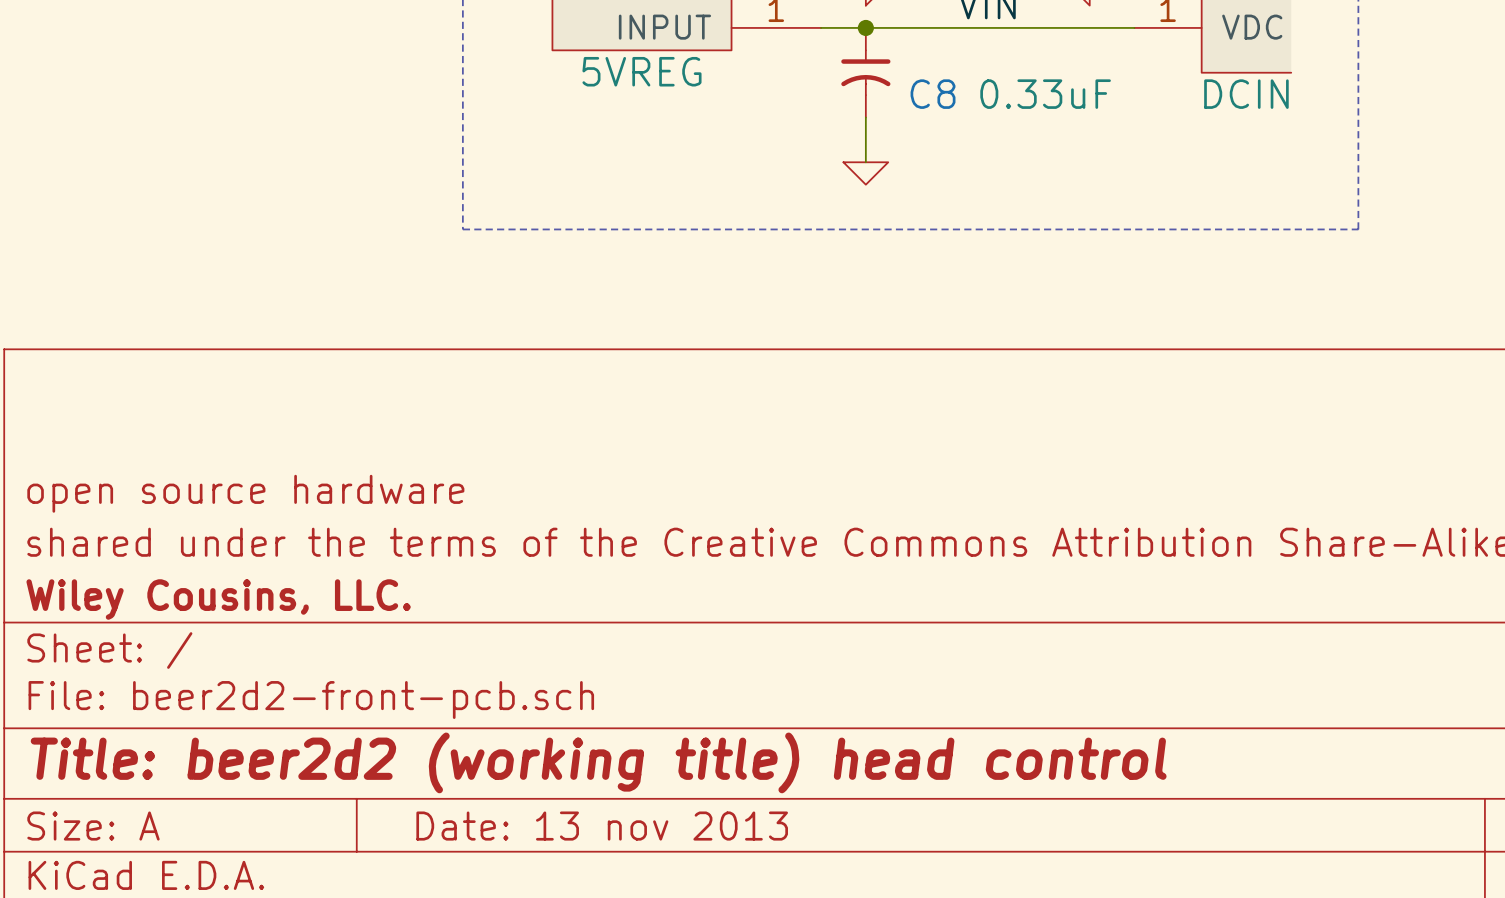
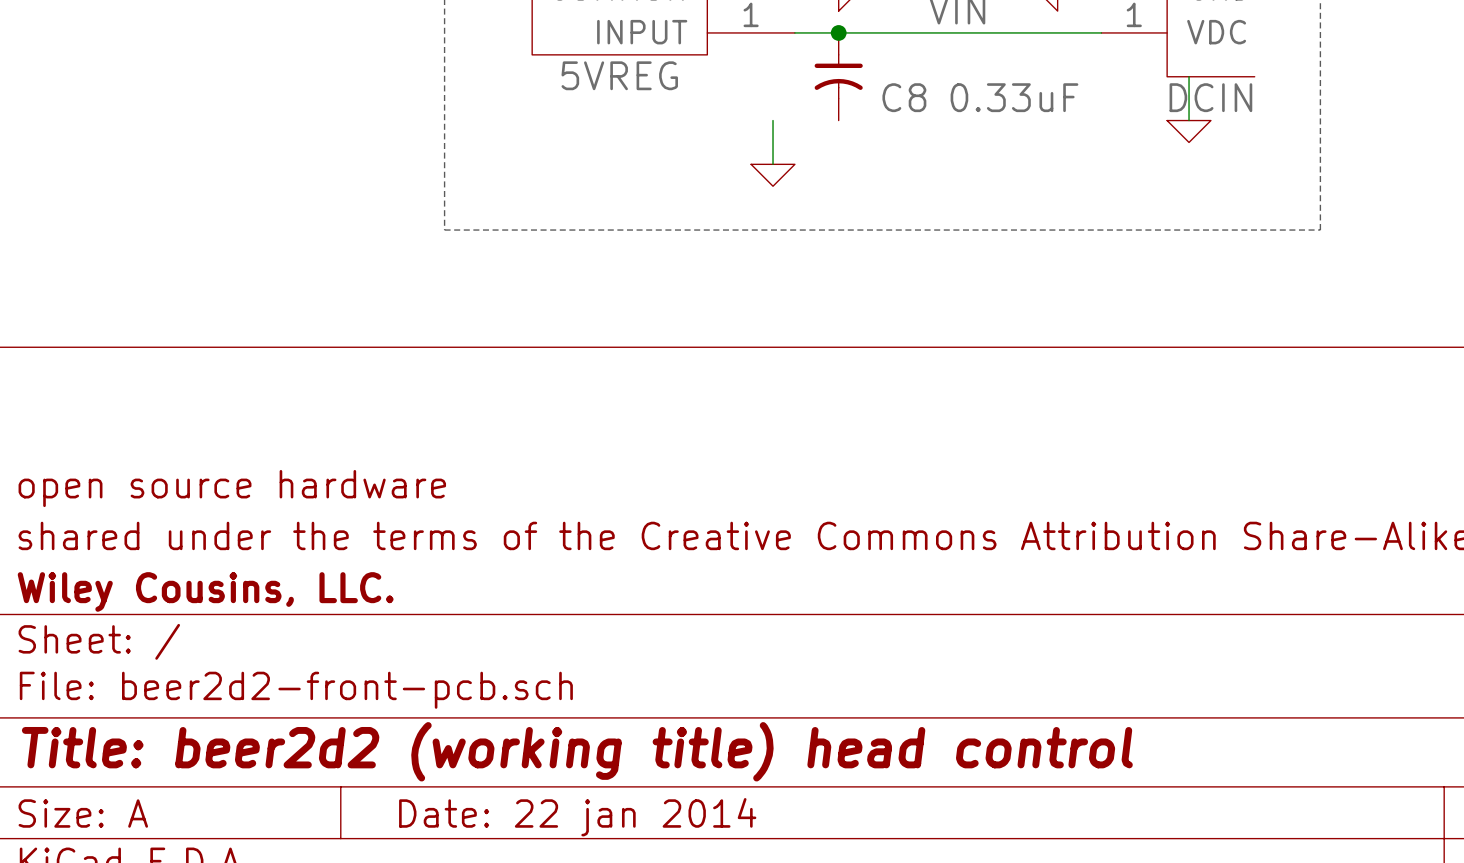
wire: none -> (1189, 76) (1189, 120)
wire: (865, 117) (865, 162) -> (773, 120) (773, 164)
power symbol: none -> (1189, 131)
power symbol position: (865, 173) -> (773, 175)
title block: Date: 13 nov 2013 (602, 826) -> Date: 22 jan 2014 (577, 817)

